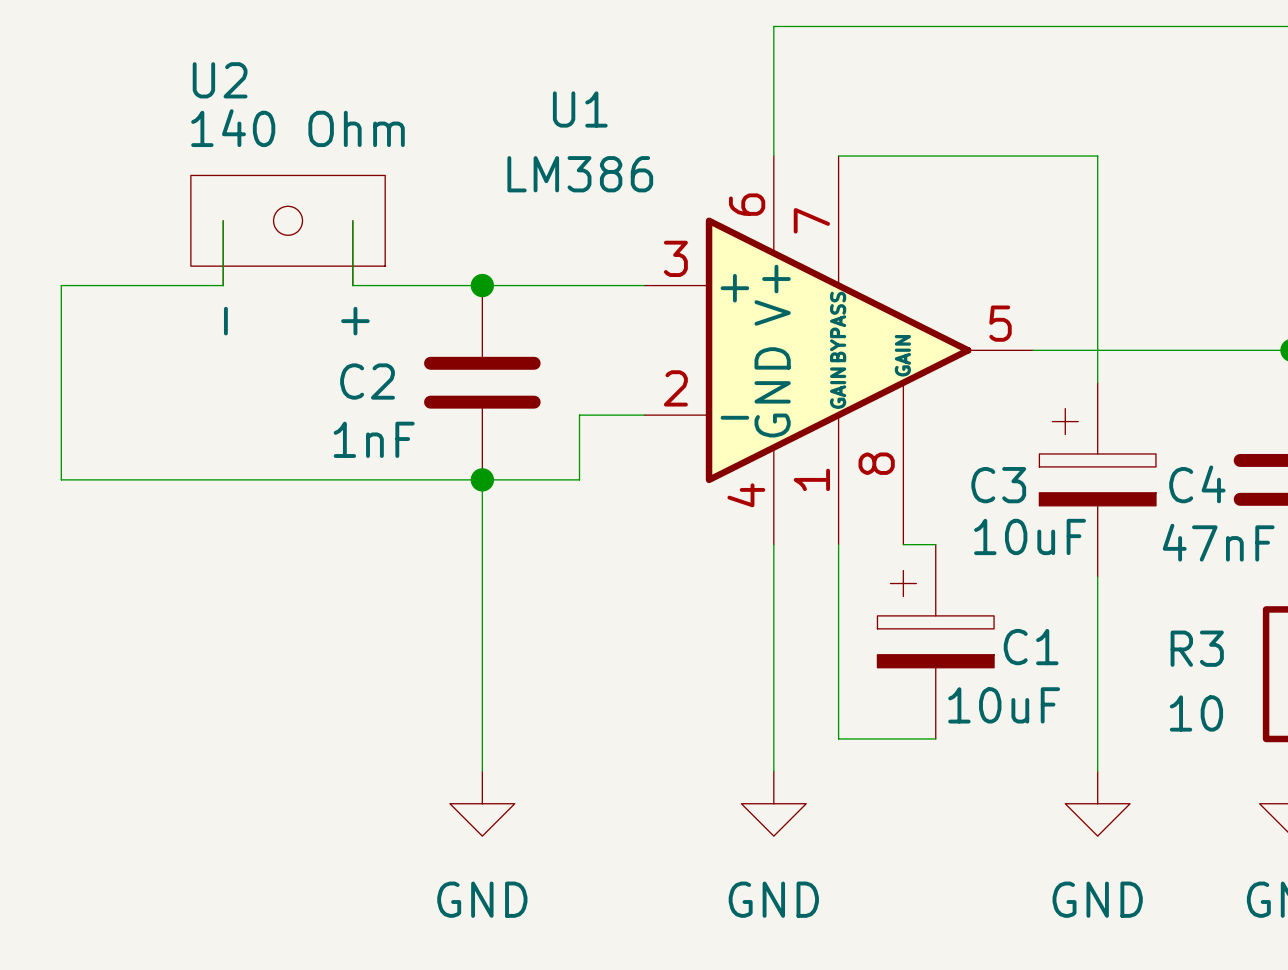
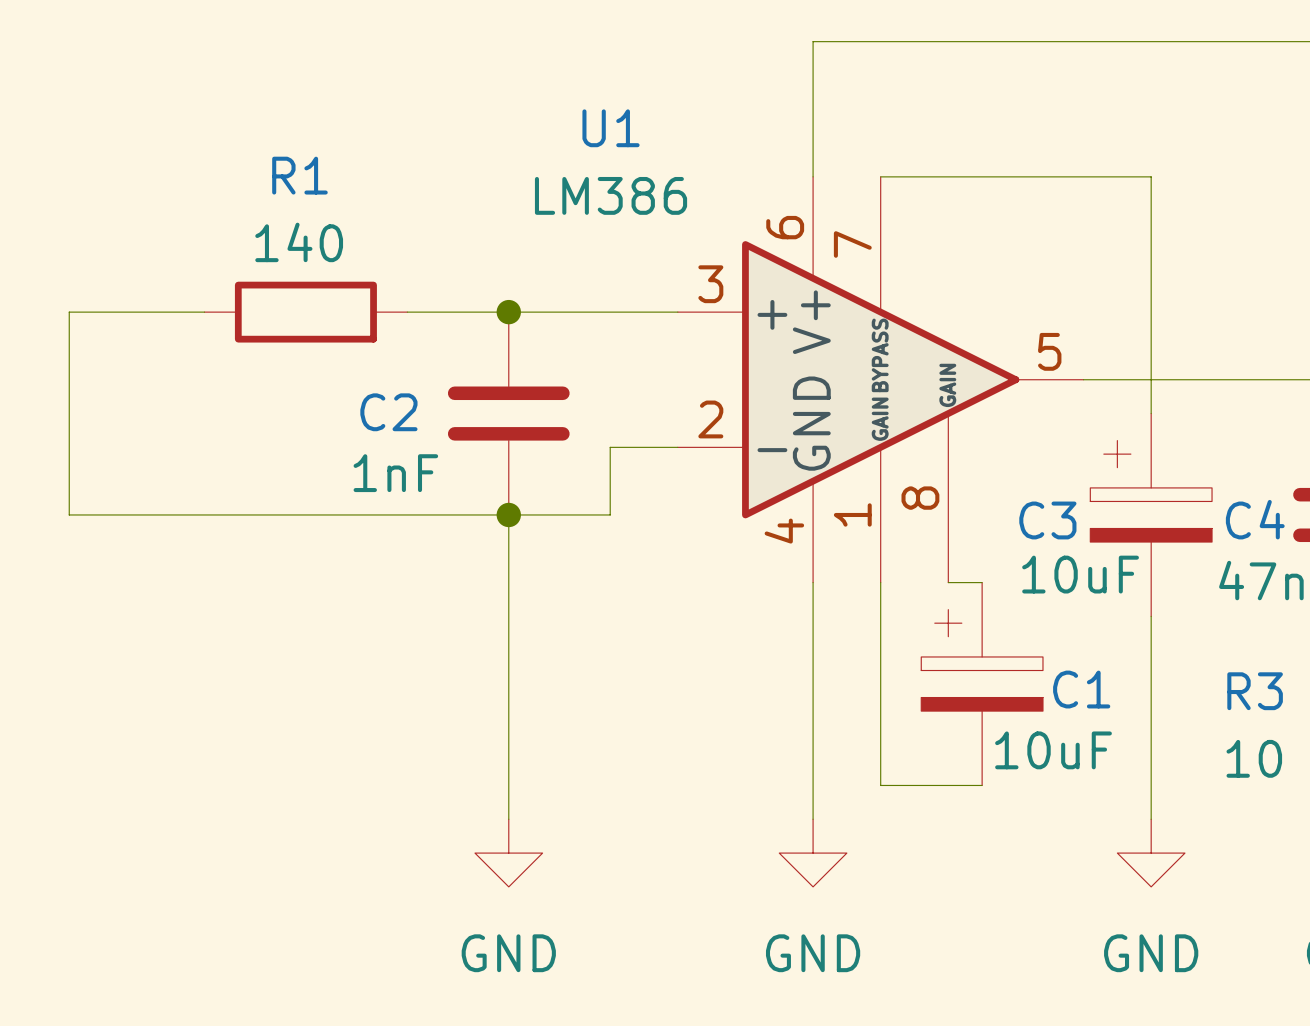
U2: 140 Ohm (288, 230) -> none
R1: none -> 140 (305, 312)

